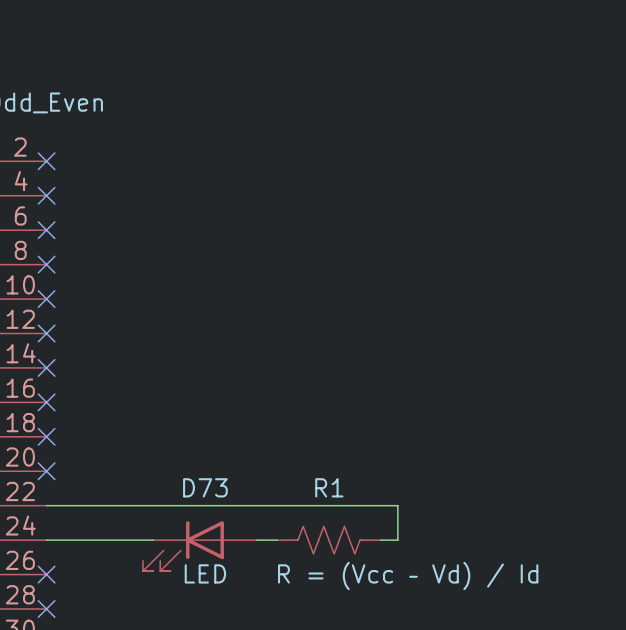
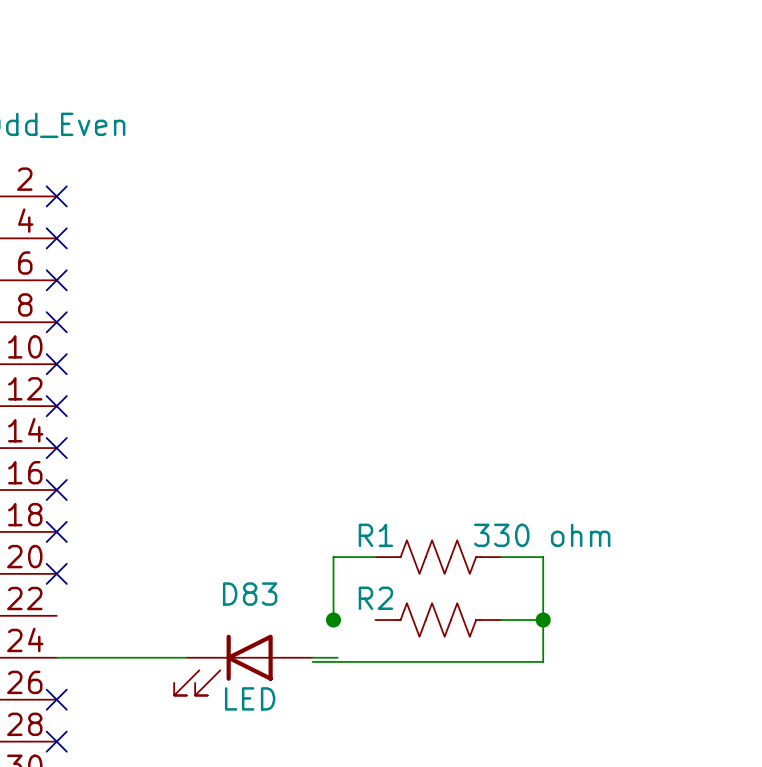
R1 text: none -> 330 ohm (542, 535)
wire: none -> (375, 557) (333, 557) (333, 620)
wire: none -> (501, 557) (543, 557) (543, 661) (312, 661)
D73 name: D73 (205, 487) -> D83 (250, 594)
R1 name position: R1 (329, 487) -> R1 (375, 535)
wire: (46, 505) (397, 505) (397, 540) (380, 540) -> none
junction: none -> (333, 620)
R2: none -> (438, 620)
wire: none -> (501, 620) (543, 620)
junction: none -> (543, 620)
R1 position: (328, 540) -> (438, 557)
R1 value: R = (Vcc – Vd) / Id (408, 575) -> none

